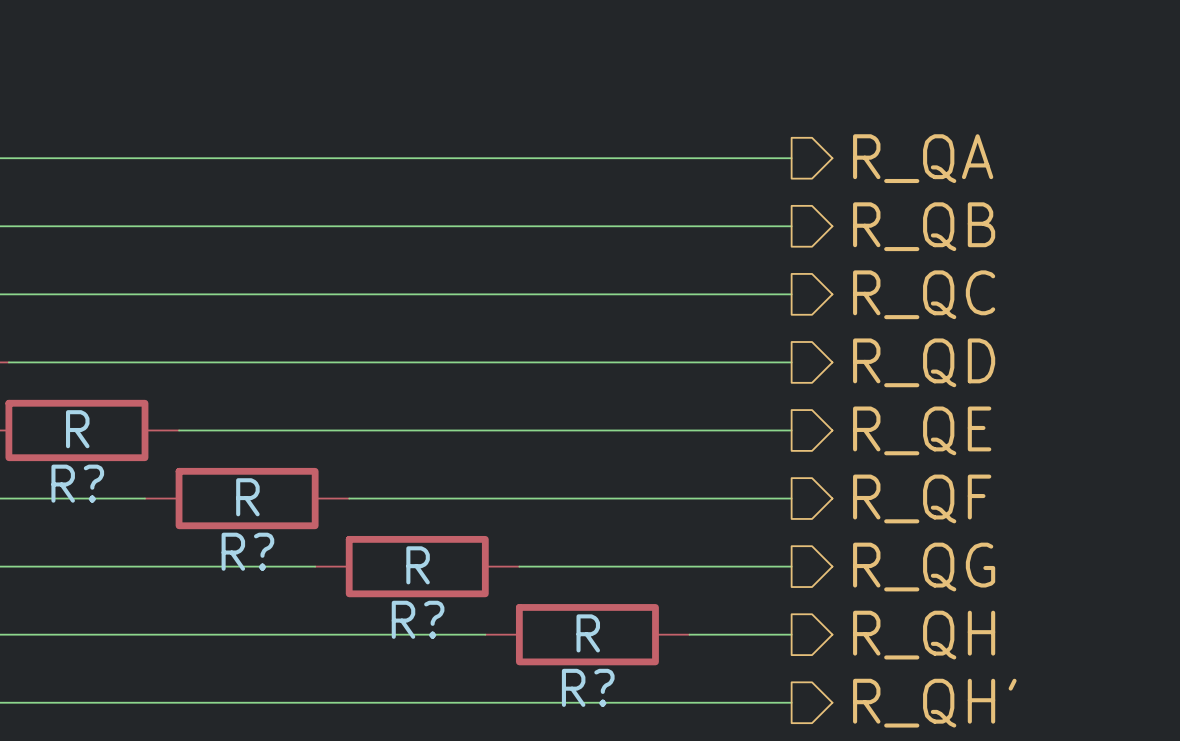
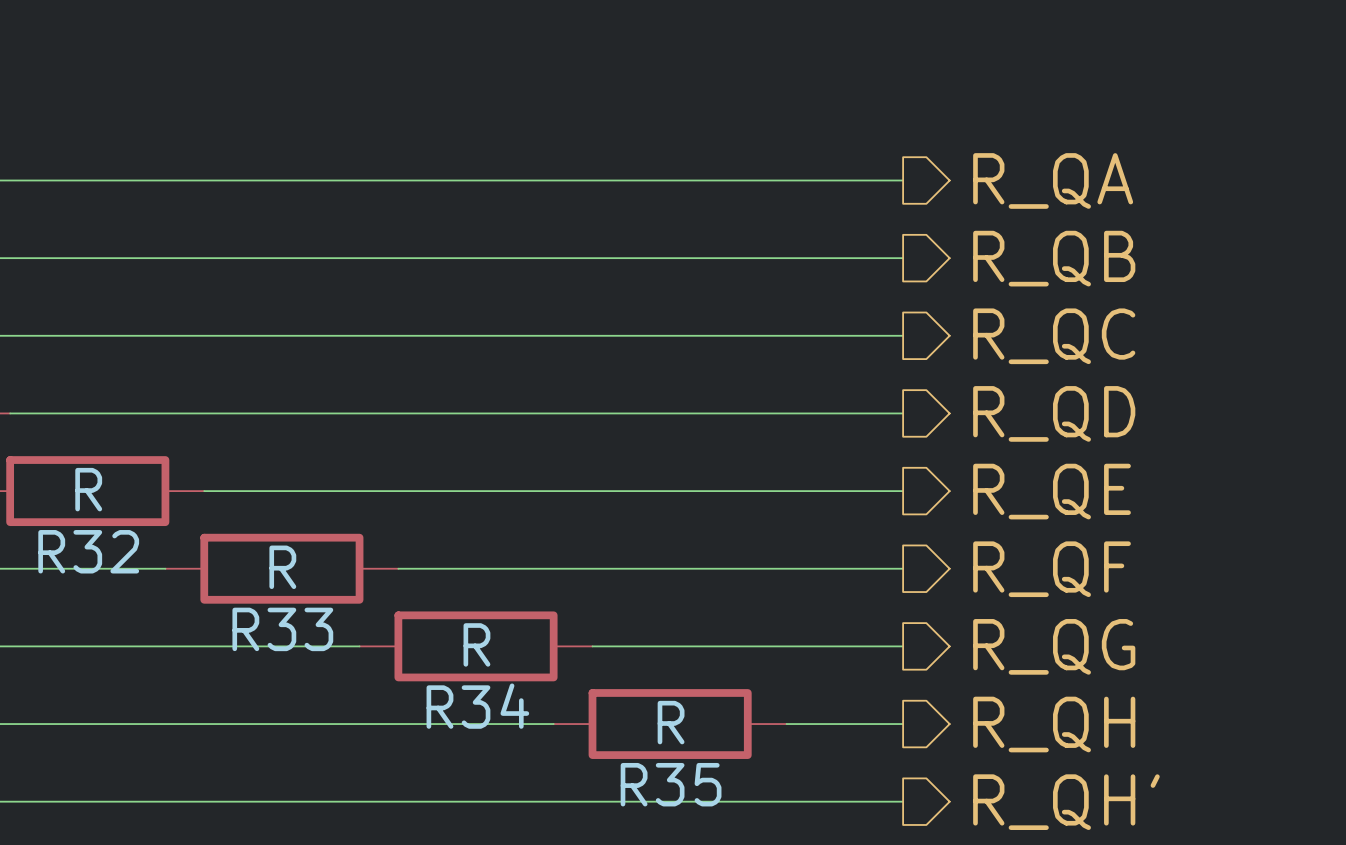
R? name: R? (77, 483) -> R32 (88, 551)
R? name: R? (247, 551) -> R33 (282, 629)
R? name: R? (418, 619) -> R34 (477, 706)
R? name: R? (588, 687) -> R35 (671, 784)

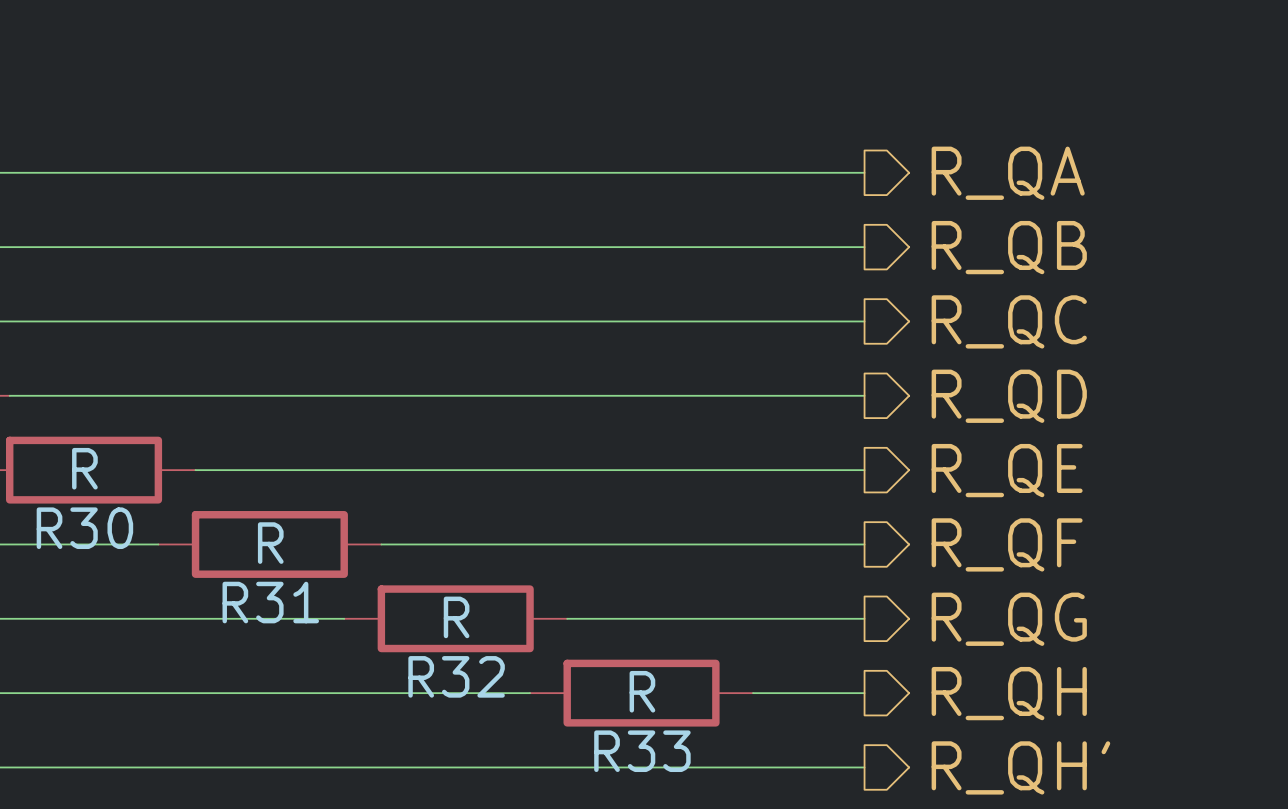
R32 name: R32 (88, 551) -> R30 (84, 528)
R33 name: R33 (282, 629) -> R31 (270, 602)
R34 name: R34 (477, 706) -> R32 (456, 676)
R35 name: R35 (671, 784) -> R33 (642, 751)

